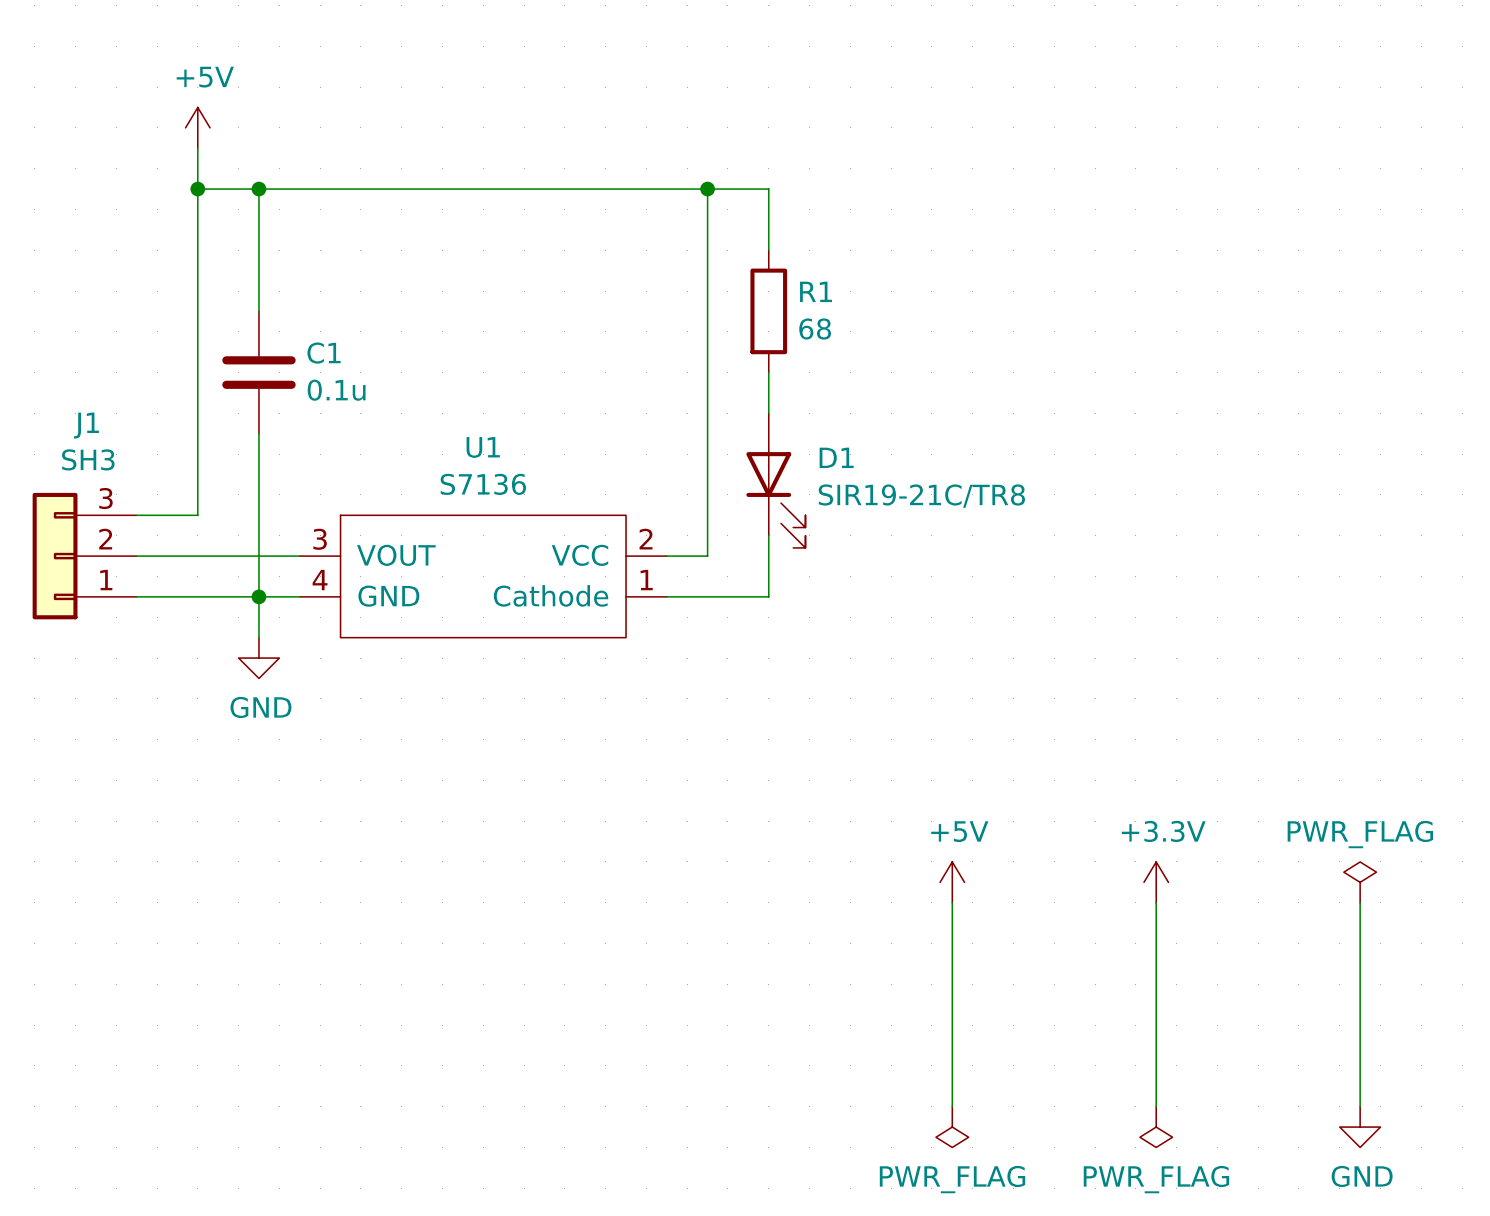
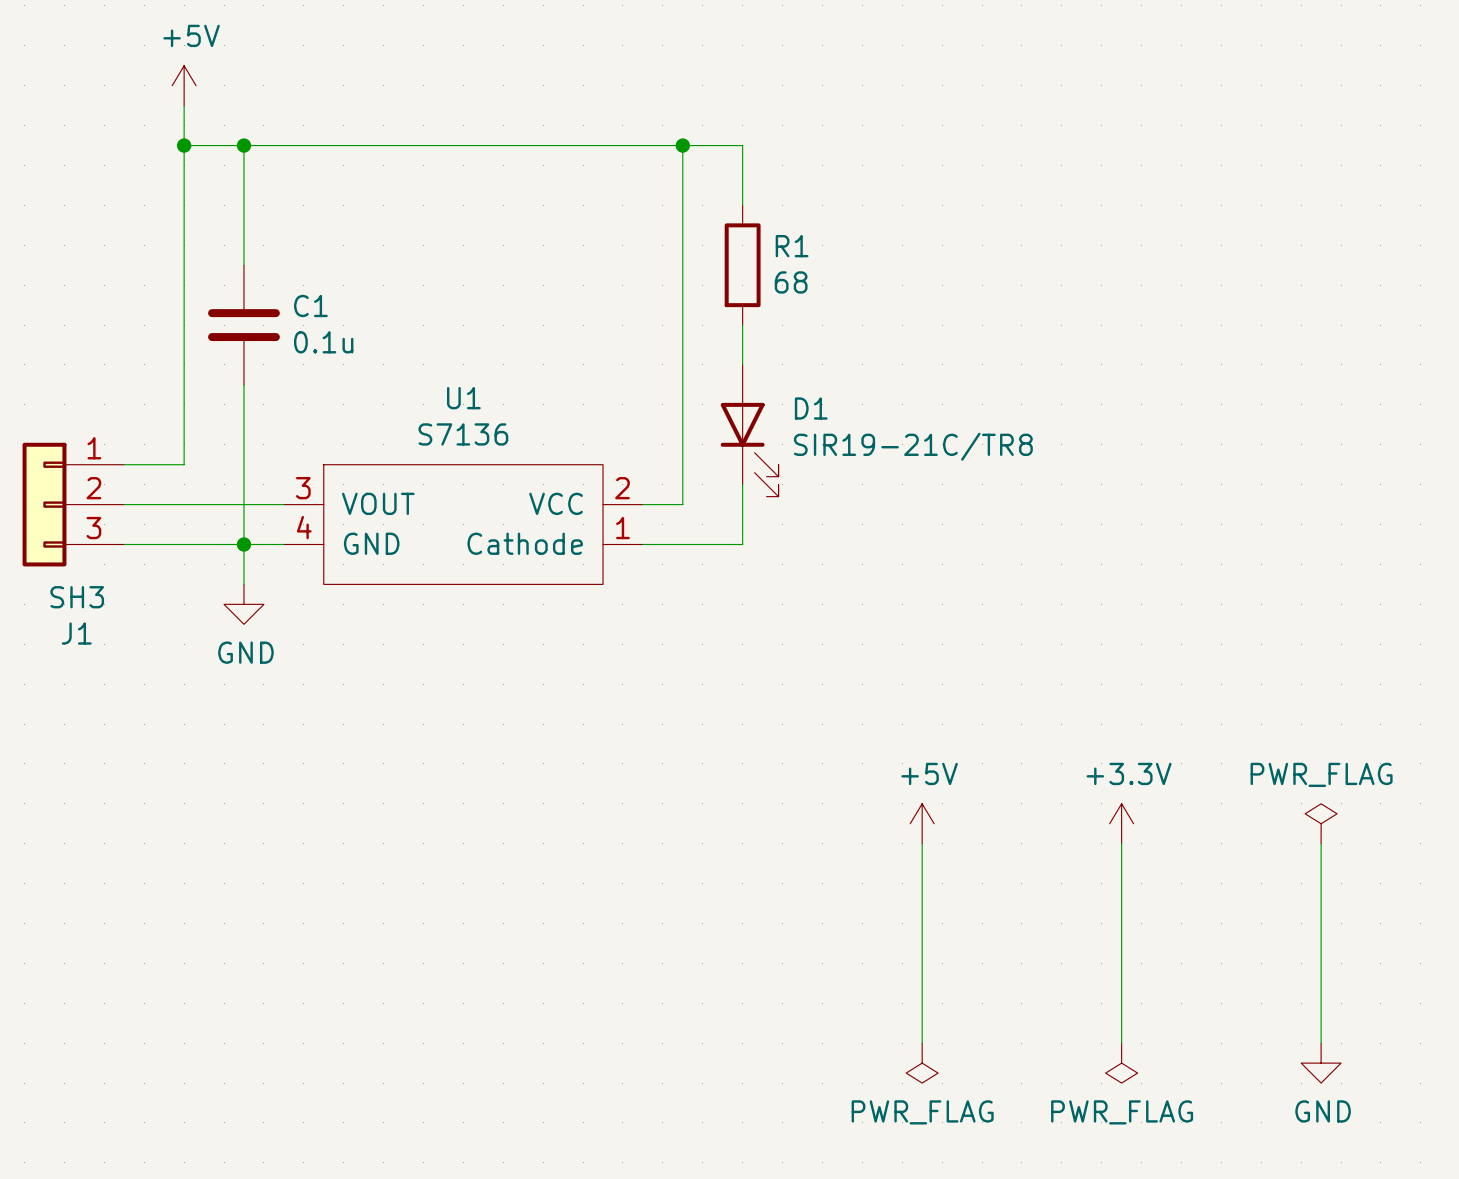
J1 flip: as is (55, 556) -> up-down (44, 504)

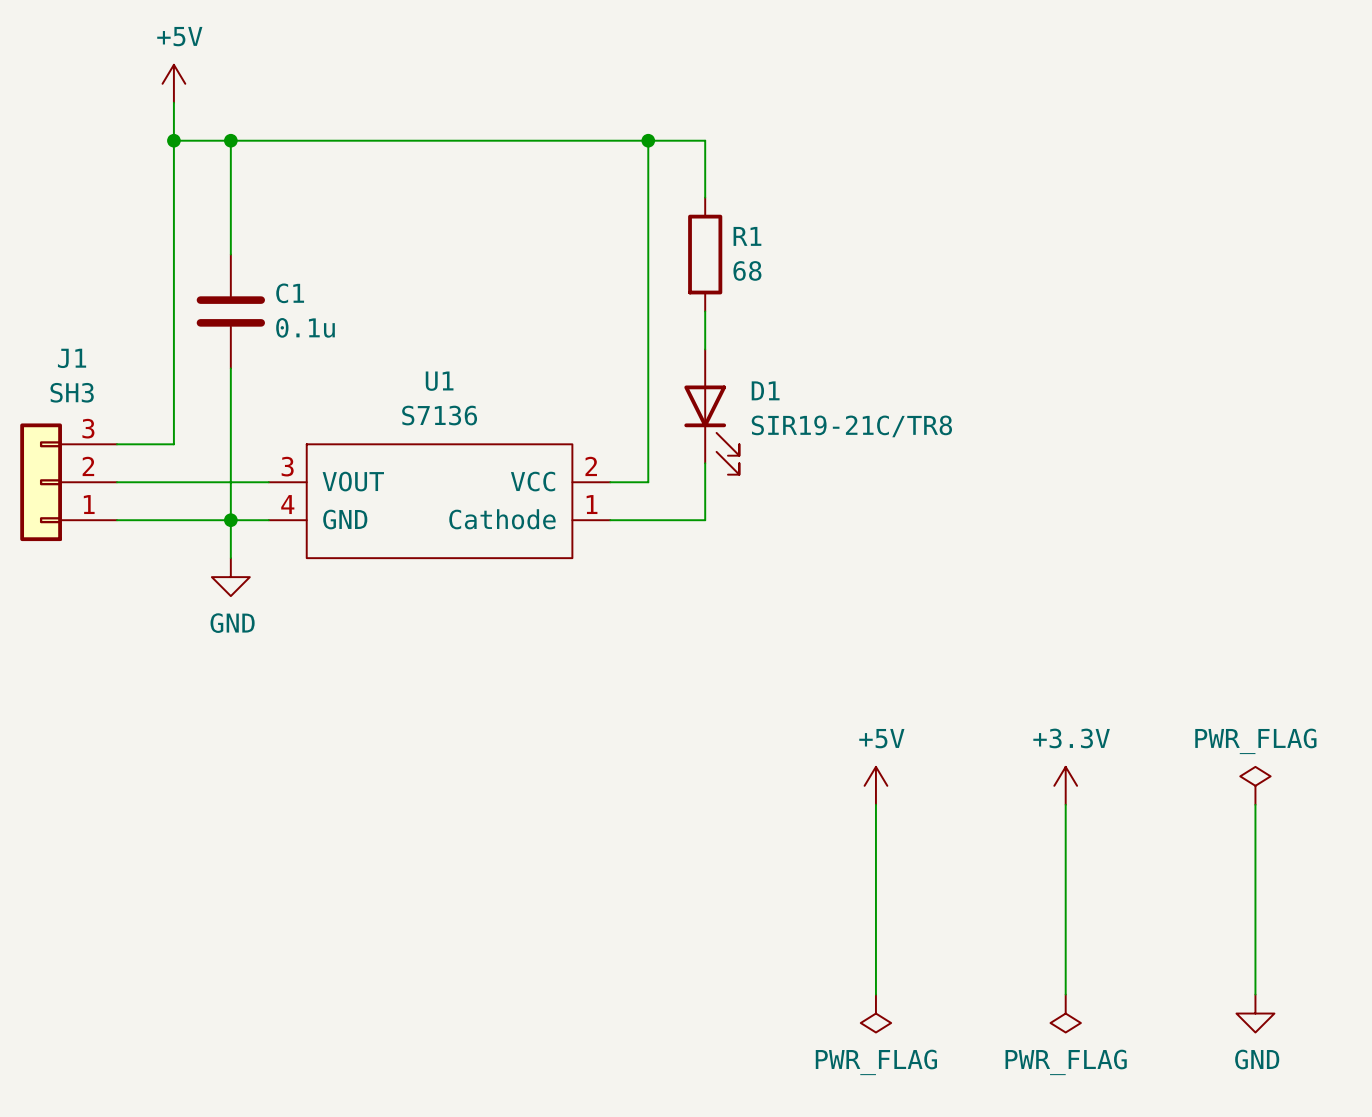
J1 flip: as is (44, 504) -> up-down (41, 482)

